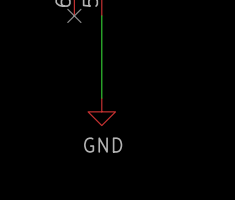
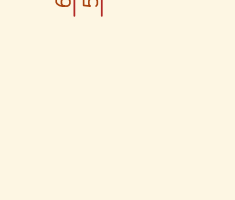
no-connect mark: (74, 15) -> none
wire: (101, 15) (101, 98) -> none
power symbol: GND (101, 111) -> none

